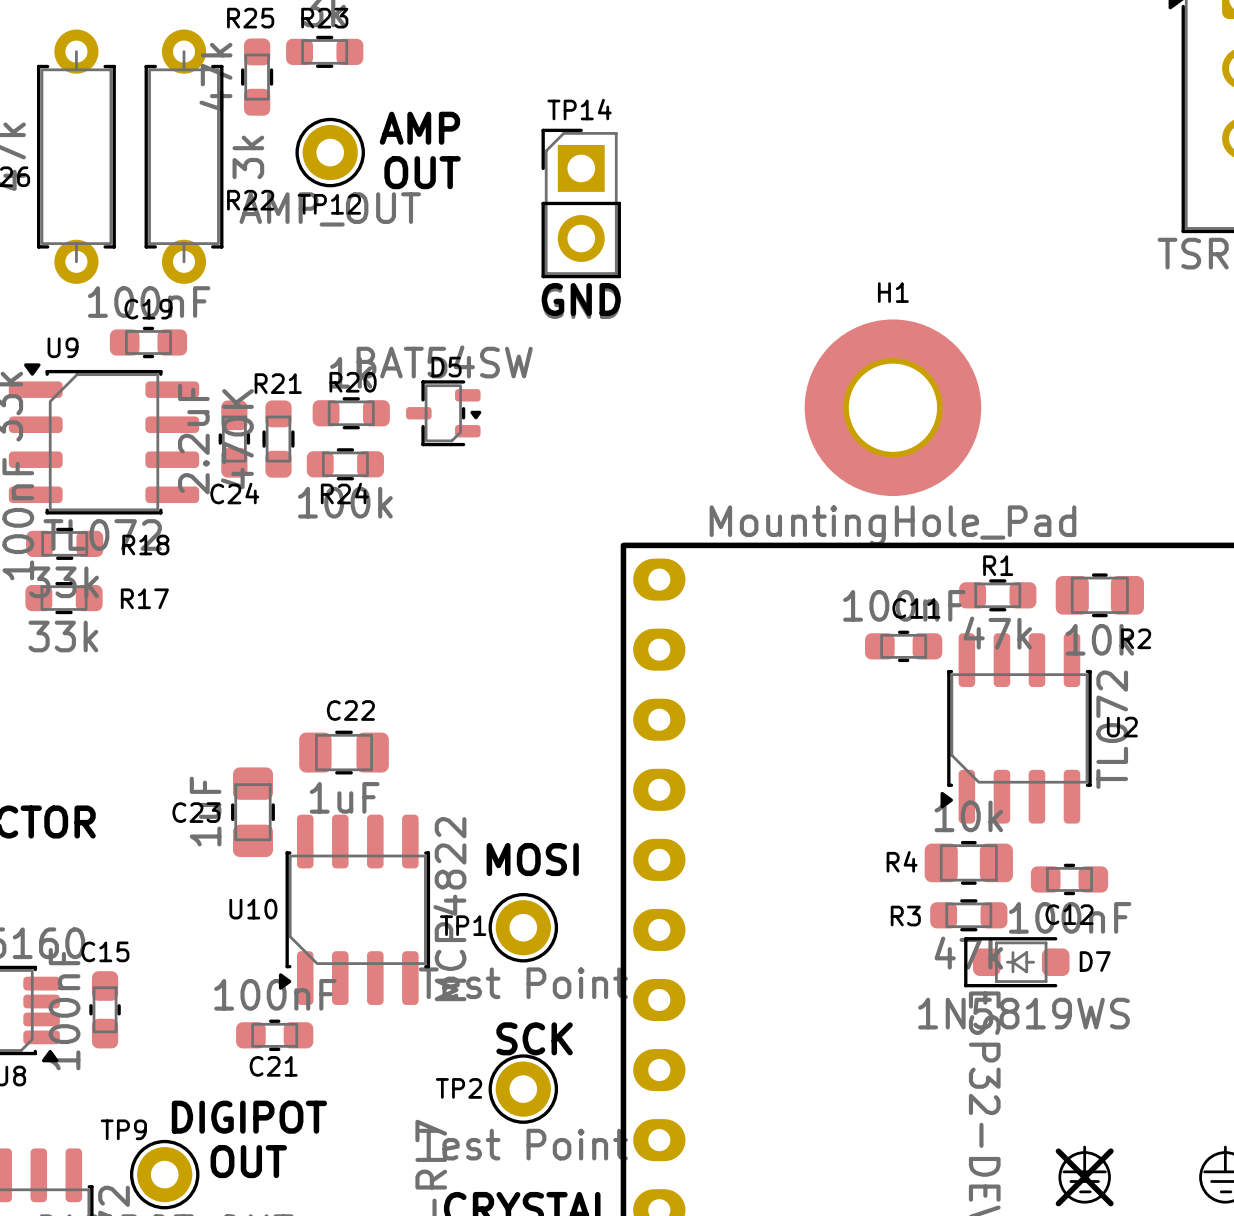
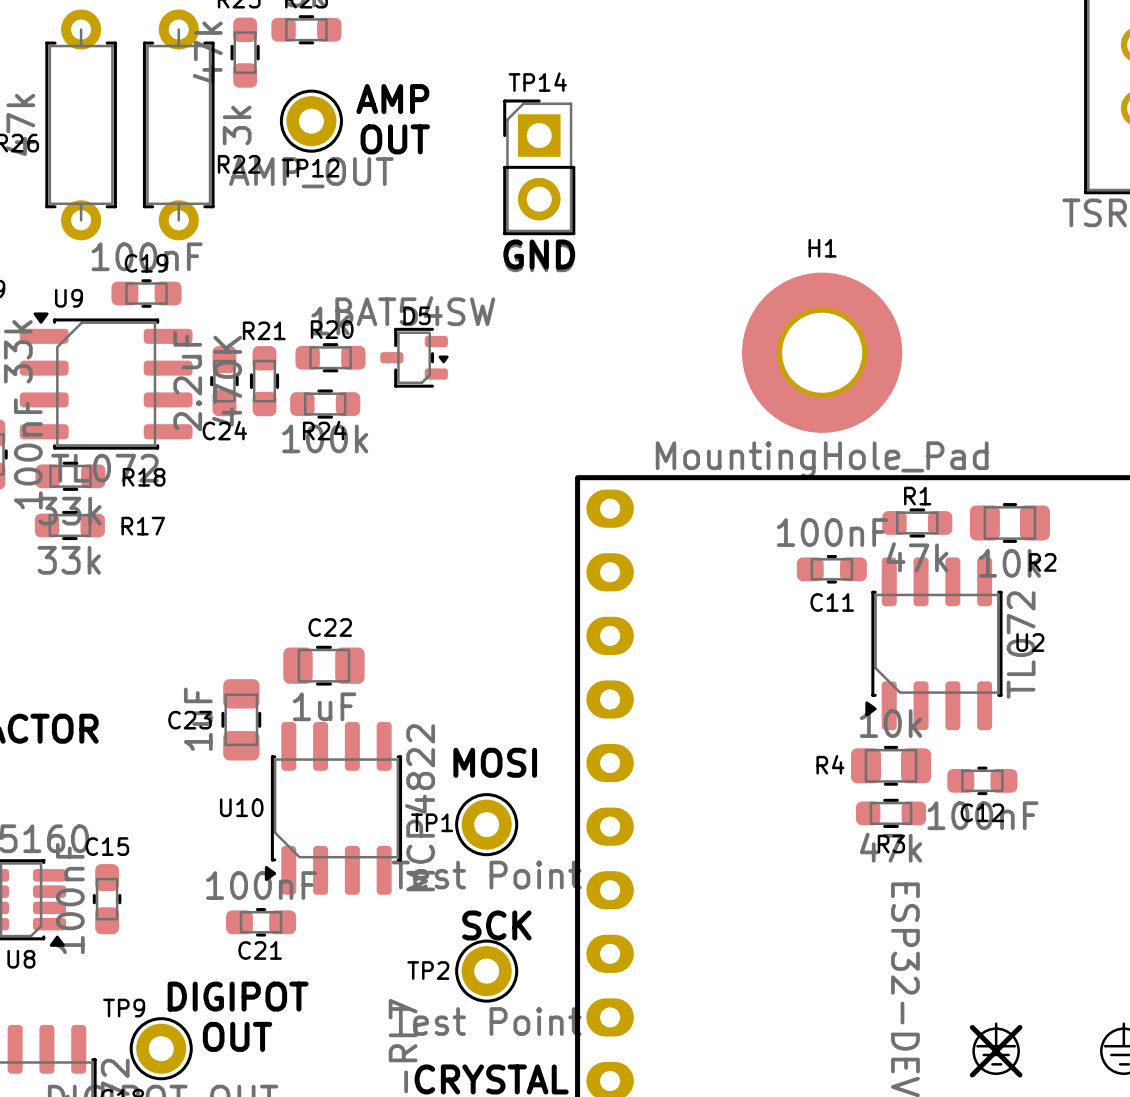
C11 name position: C11 (916, 608) -> C11 (832, 602)
R3 name position: R3 (905, 916) -> R3 (891, 844)
D7: 1N5819WS (1016, 962) -> none

